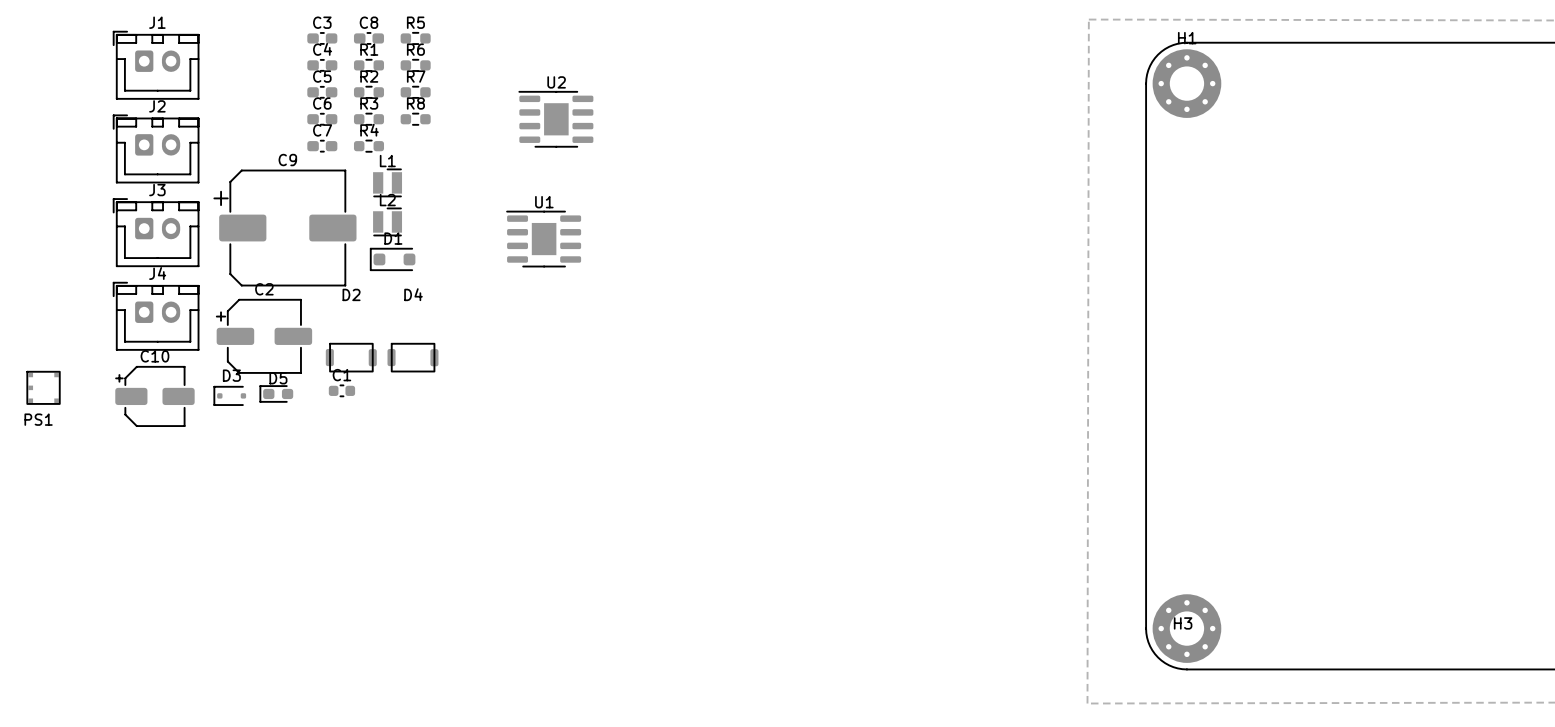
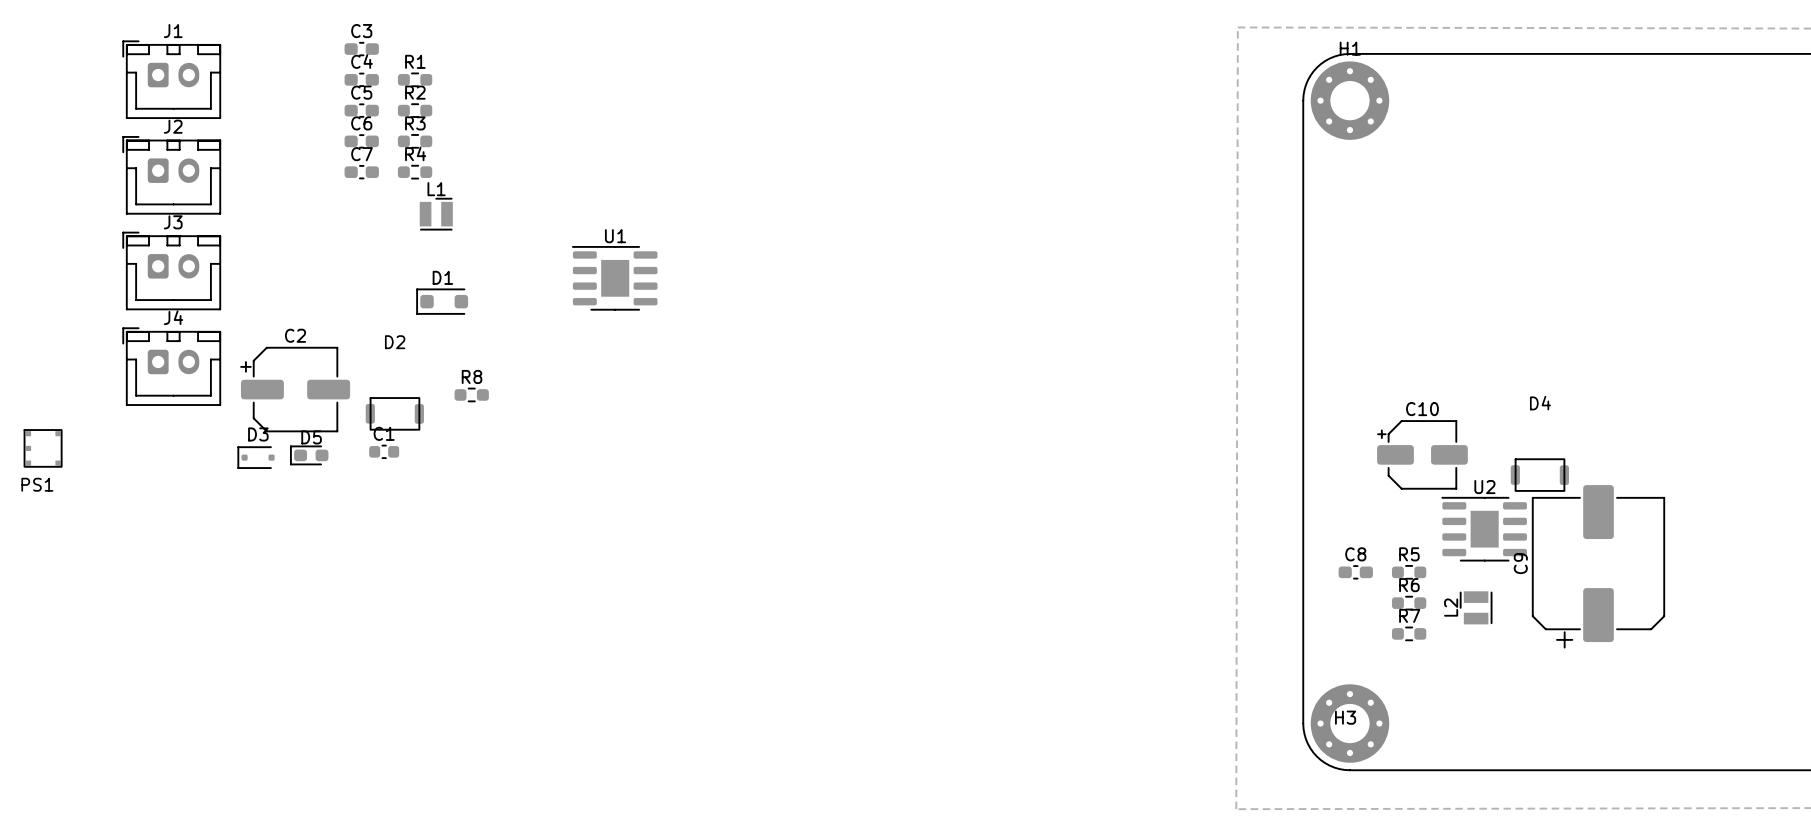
C8 position: (368, 38) -> (1355, 572)
R5 position: (415, 38) -> (1409, 572)
R6 position: (415, 65) -> (1409, 603)
R7 position: (415, 92) -> (1409, 633)
R8 position: (415, 119) -> (471, 394)
U2 position: (556, 119) -> (1484, 529)
L2 rotation: 0° (387, 221) -> 90° counterclockwise (1476, 607)
L2 position: (387, 221) -> (1476, 607)
C9 rotation: 0° (285, 228) -> 90° counterclockwise (1598, 566)
C9 position: (285, 228) -> (1598, 566)
D4 position: (412, 357) -> (1539, 475)
C10 position: (154, 396) -> (1422, 454)

